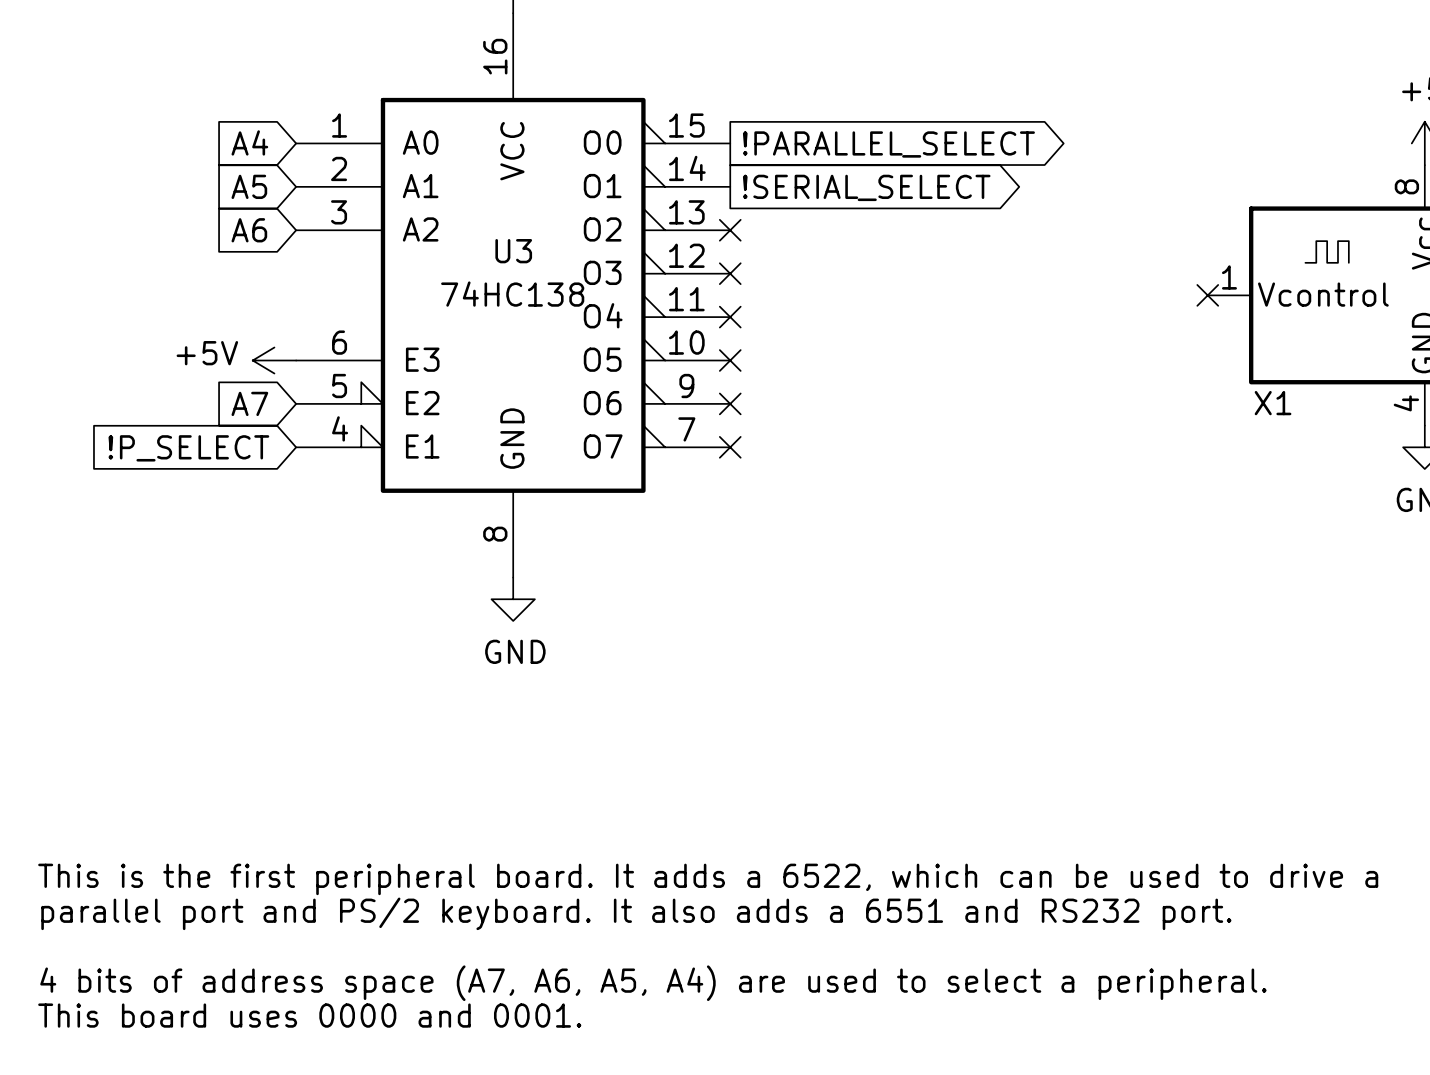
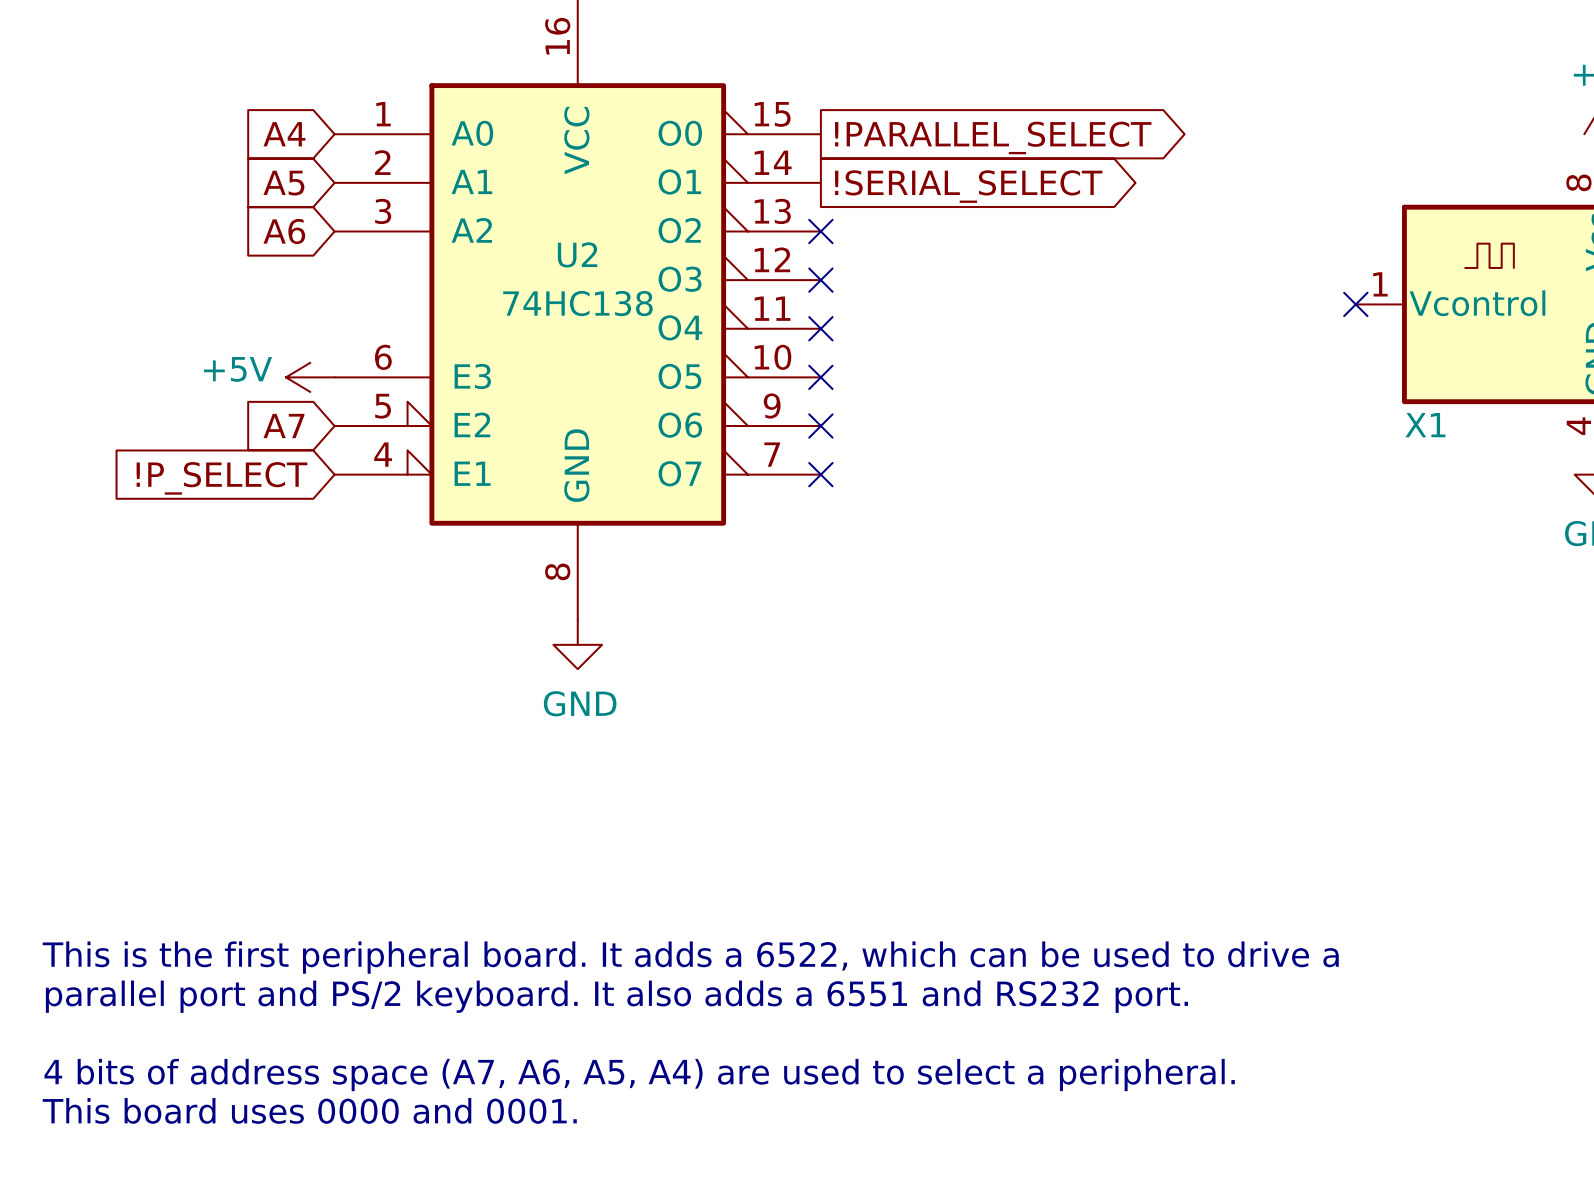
U3 name: U3 (513, 251) -> U2 (577, 254)

